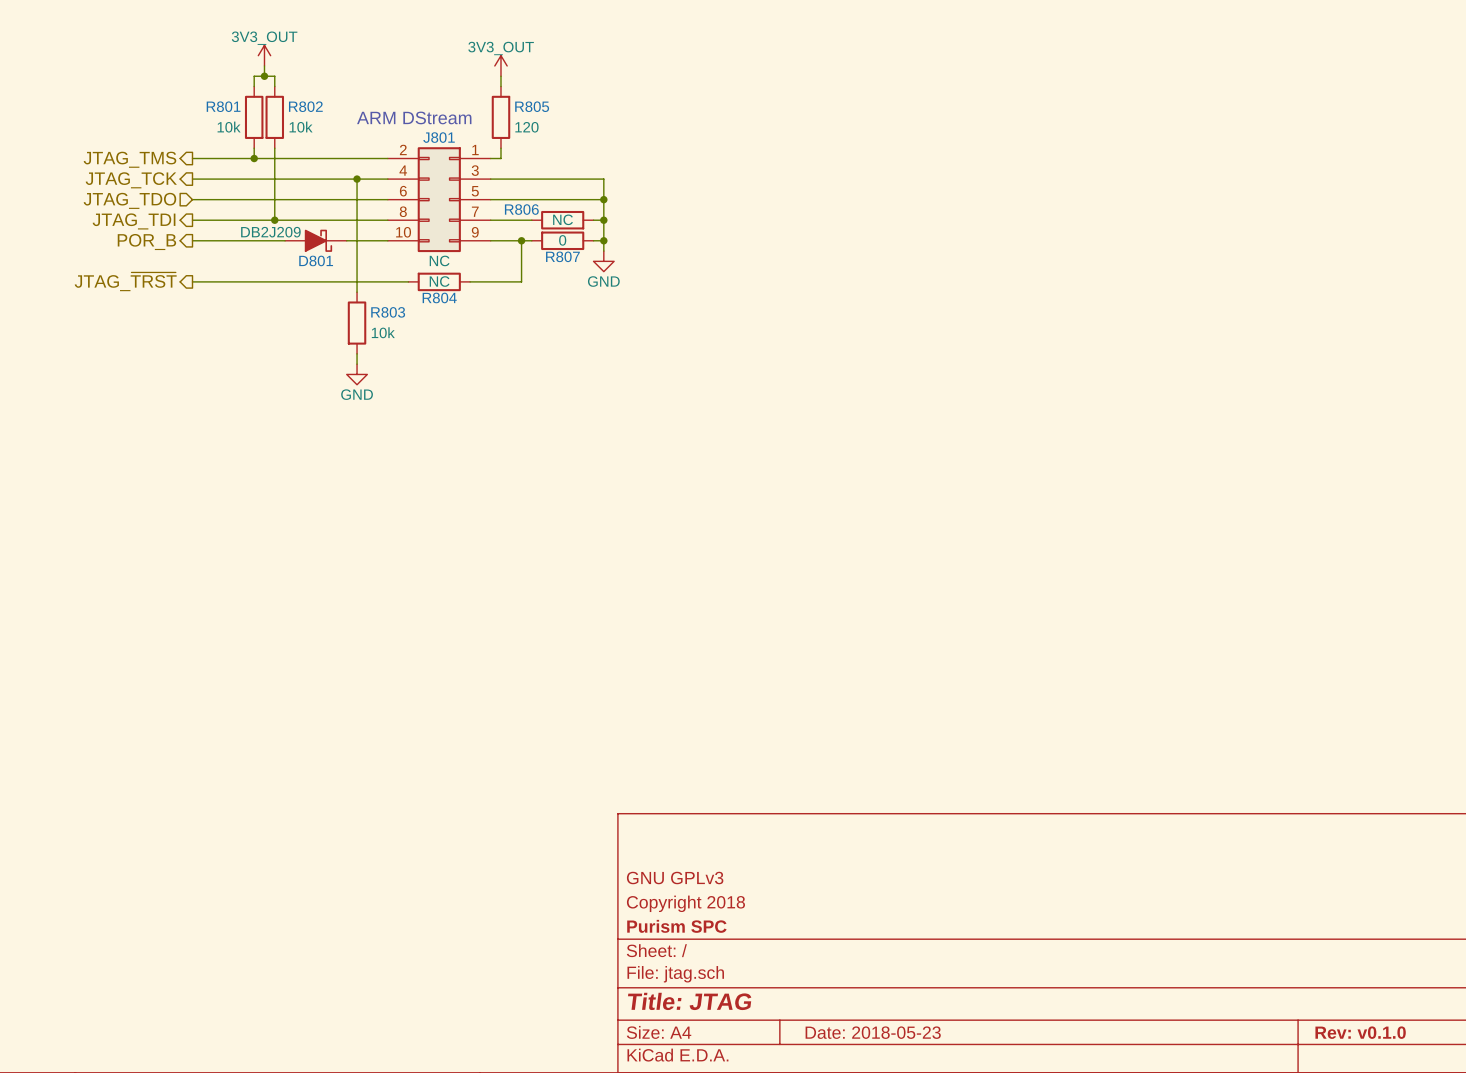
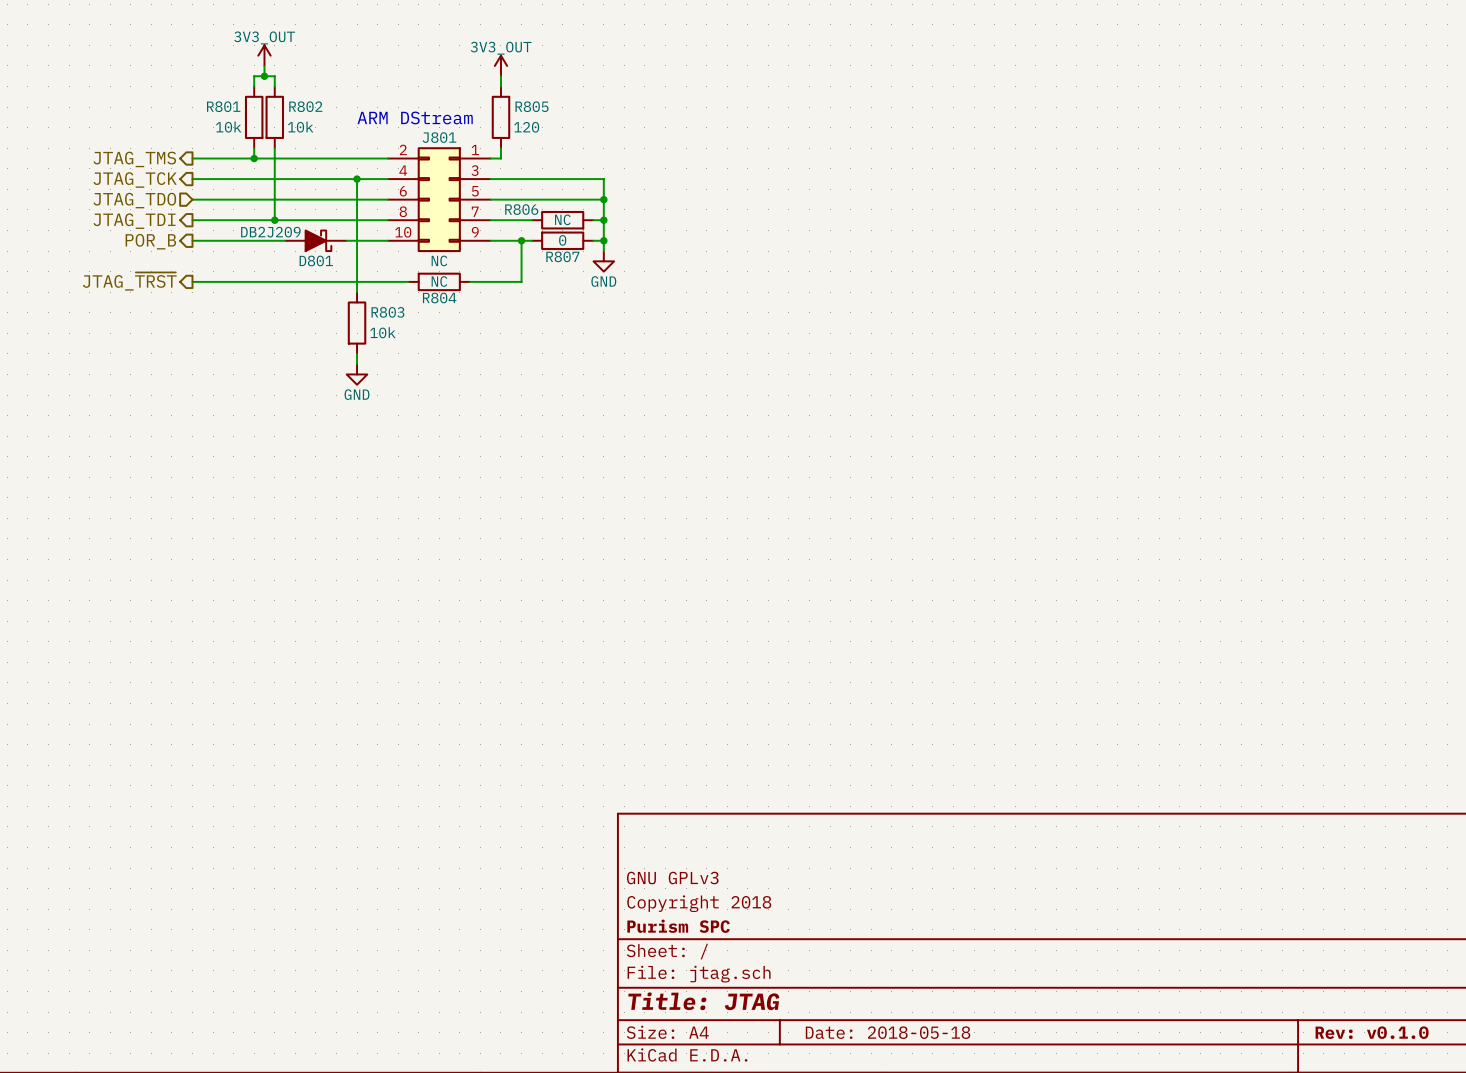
title block: Date: 2018-05-23 (873, 1032) -> Date: 2018-05-18 (888, 1032)

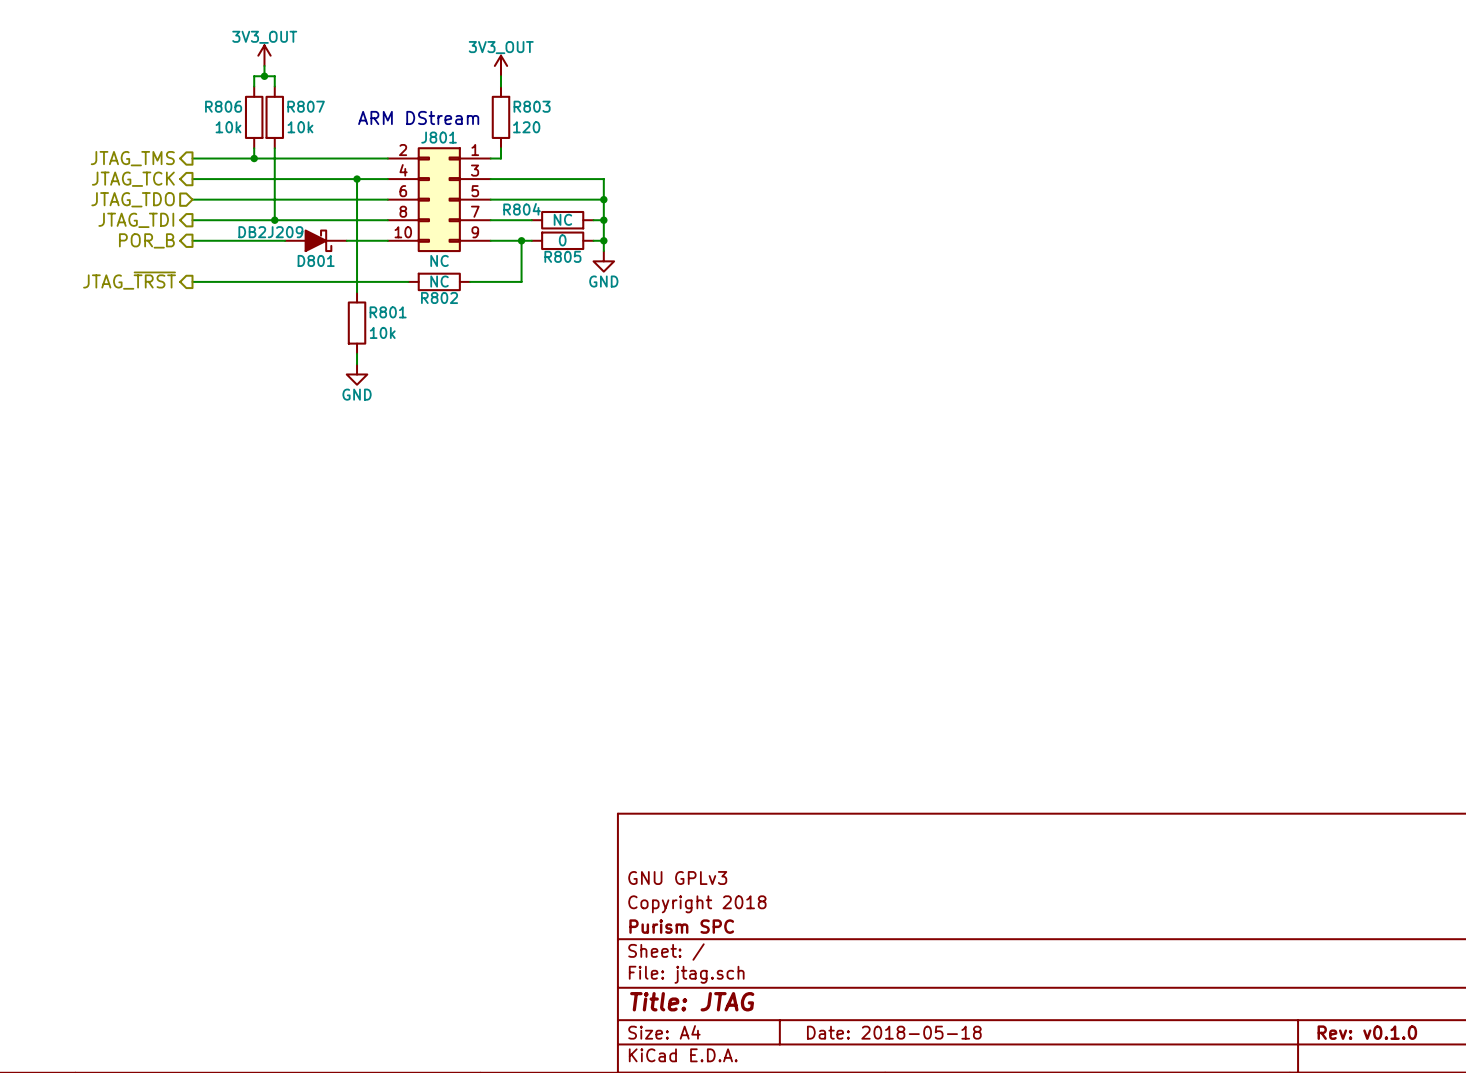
R801 name: R801 (223, 106) -> R806 (223, 106)
R802 name: R802 (305, 106) -> R807 (306, 106)
R805 name: R805 (532, 106) -> R803 (532, 106)
R806 name: R806 (521, 209) -> R804 (522, 209)
R807 name: R807 (562, 256) -> R805 (562, 256)
R804 name: R804 (439, 297) -> R802 (439, 297)
R803 name: R803 (387, 312) -> R801 (388, 312)

